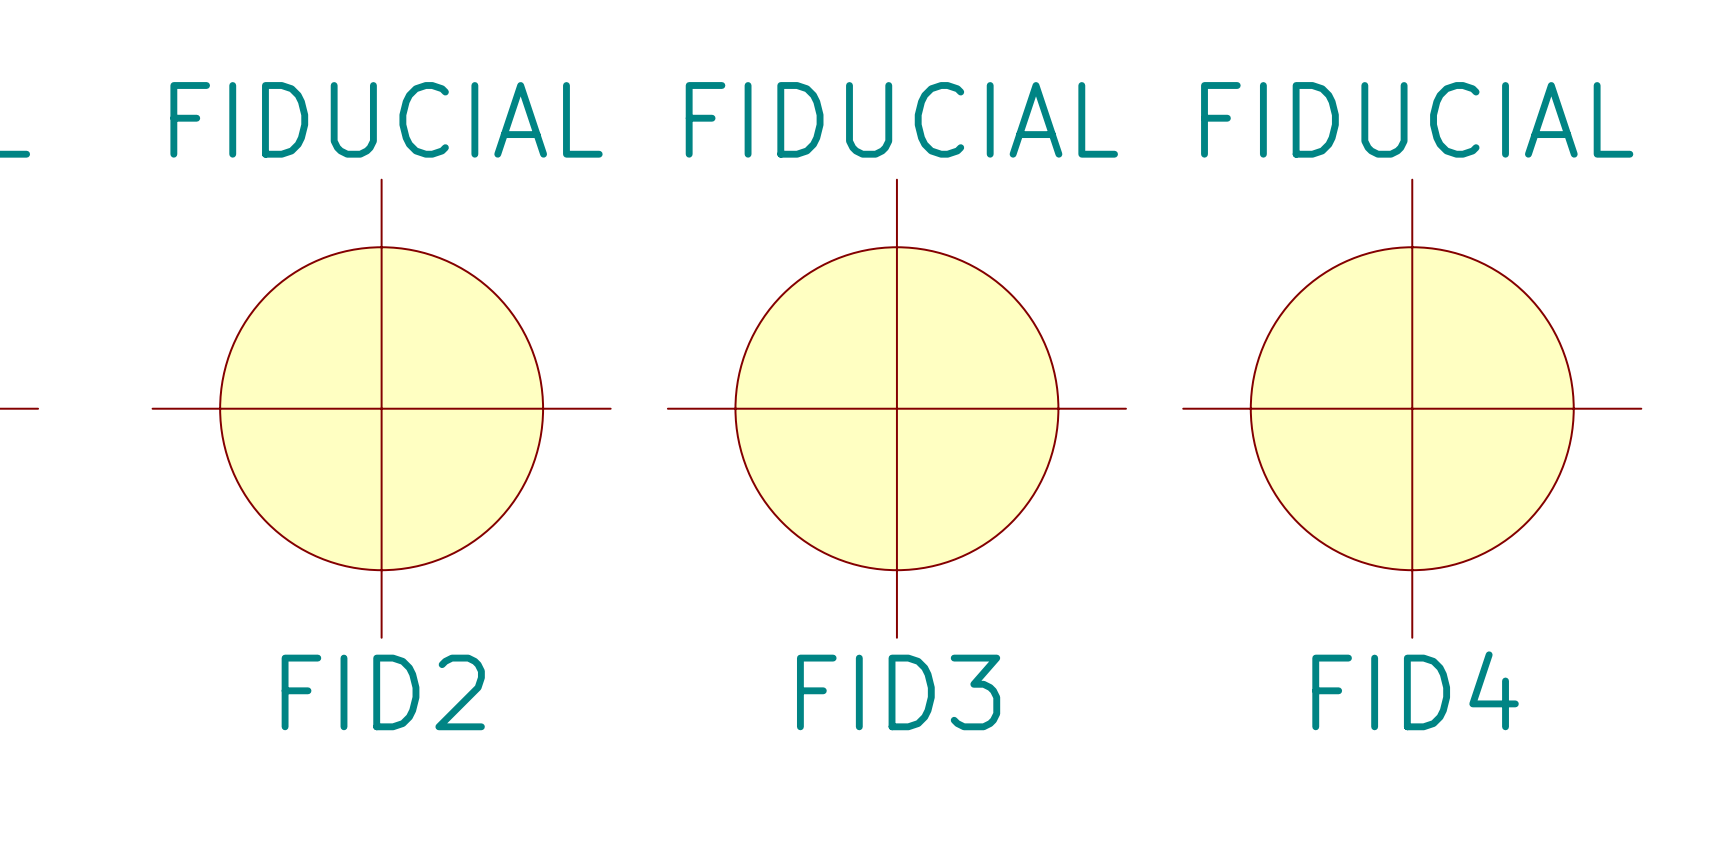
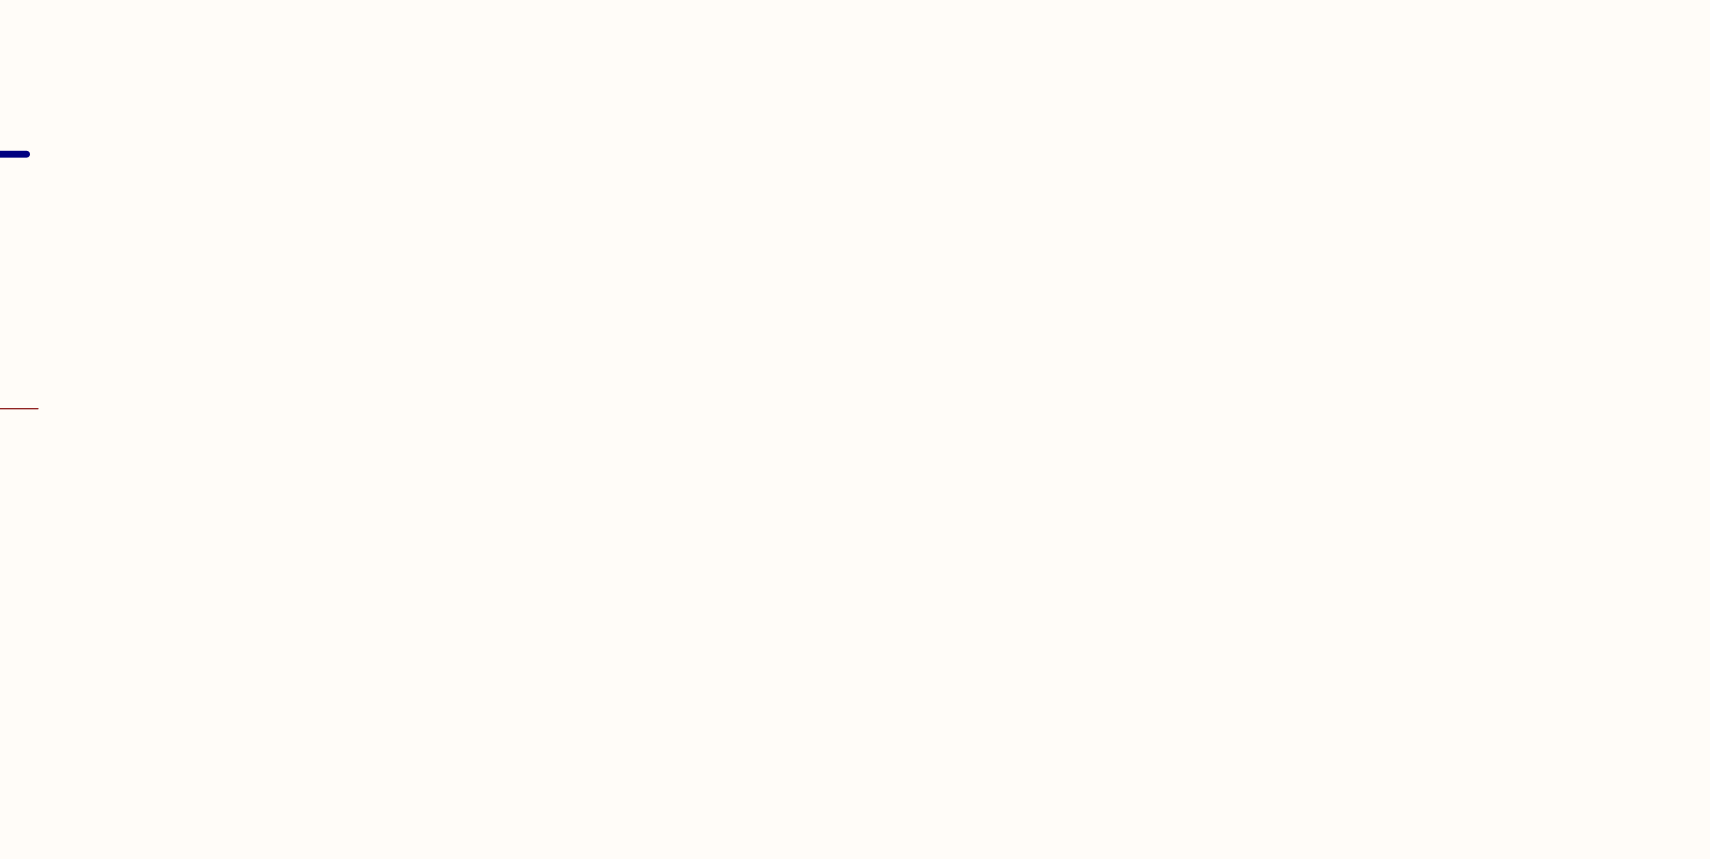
FID2: FIDUCIAL (381, 408) -> none
FID3: FIDUCIAL (896, 408) -> none
FID4: FIDUCIAL (1412, 408) -> none

